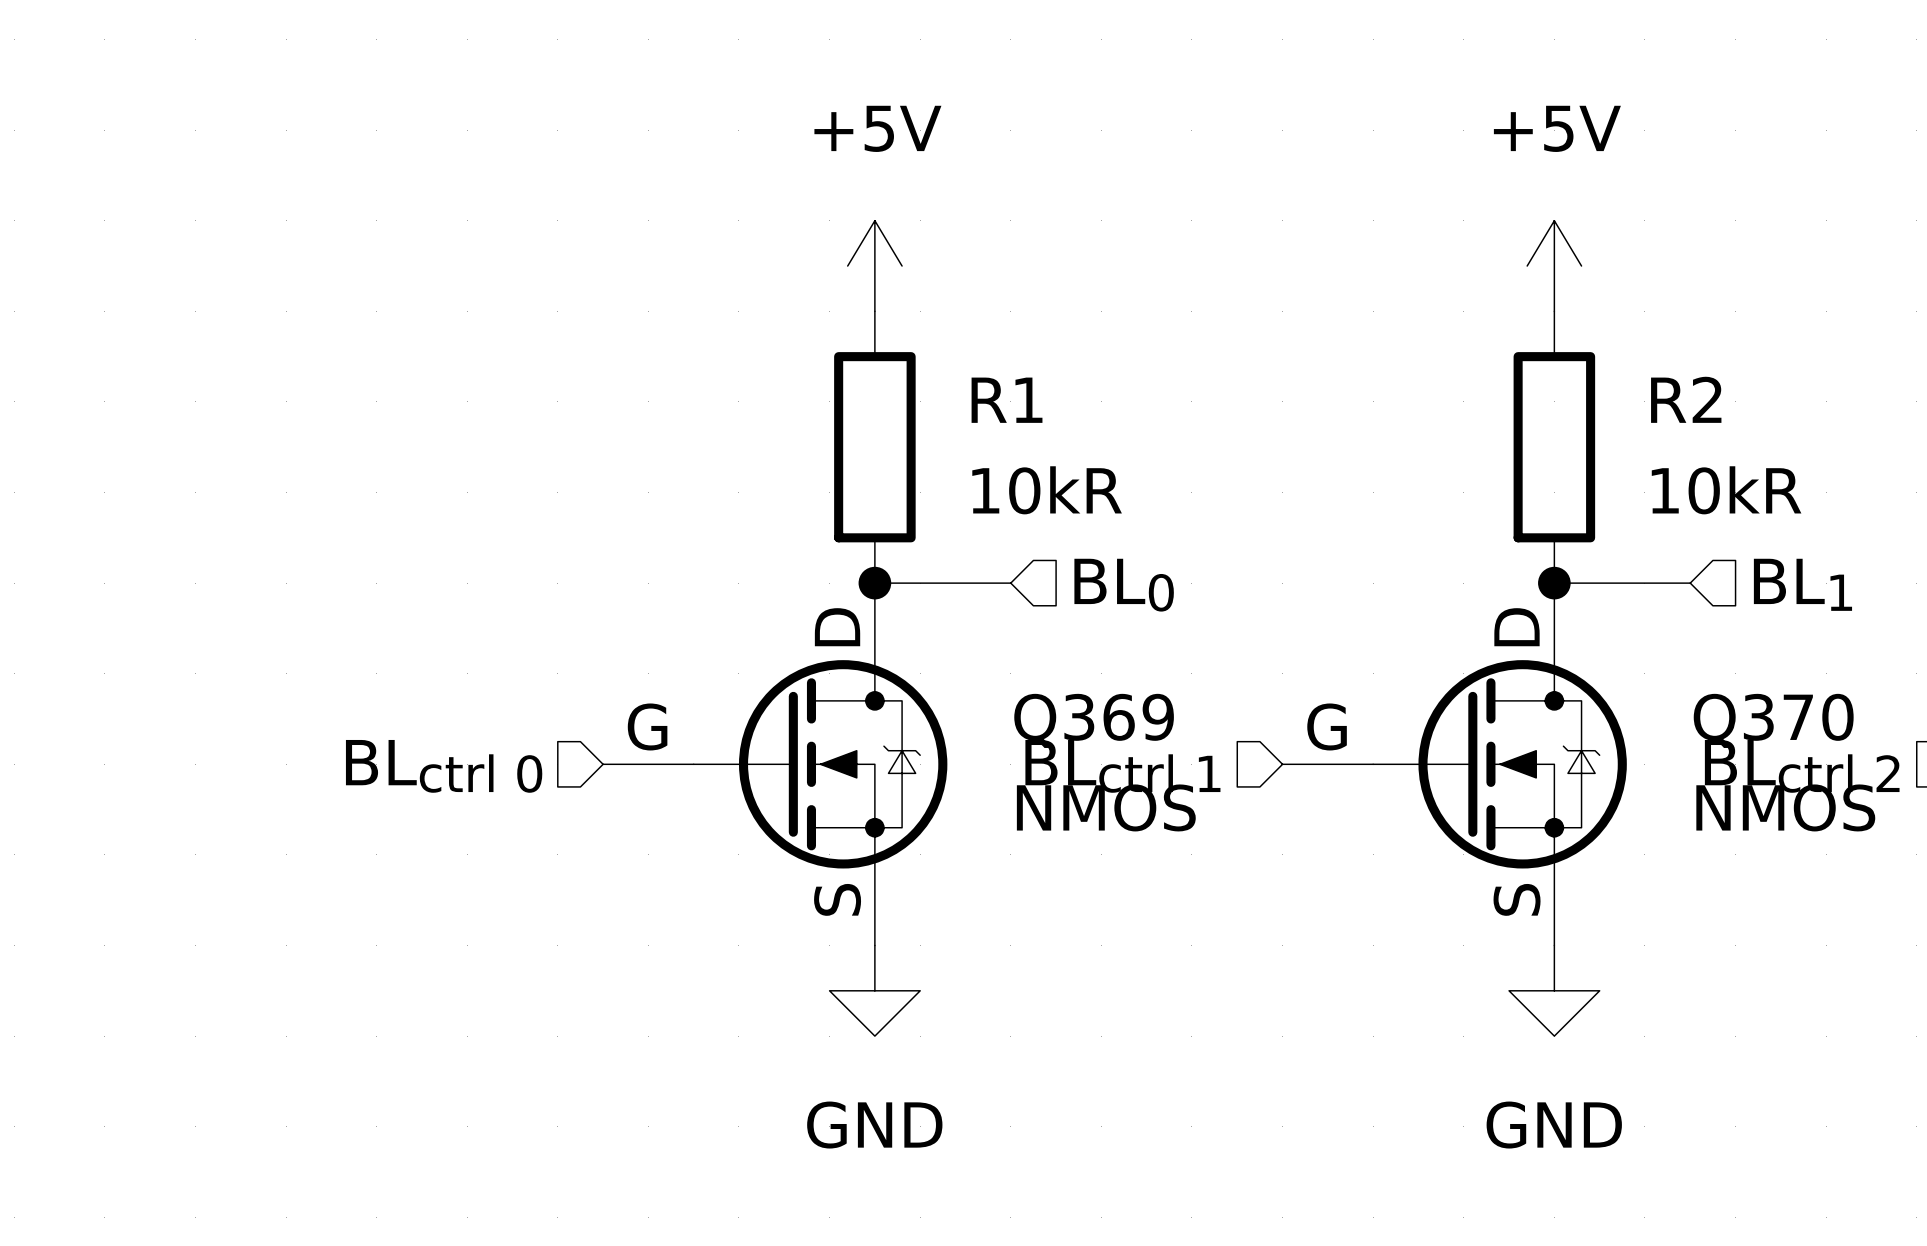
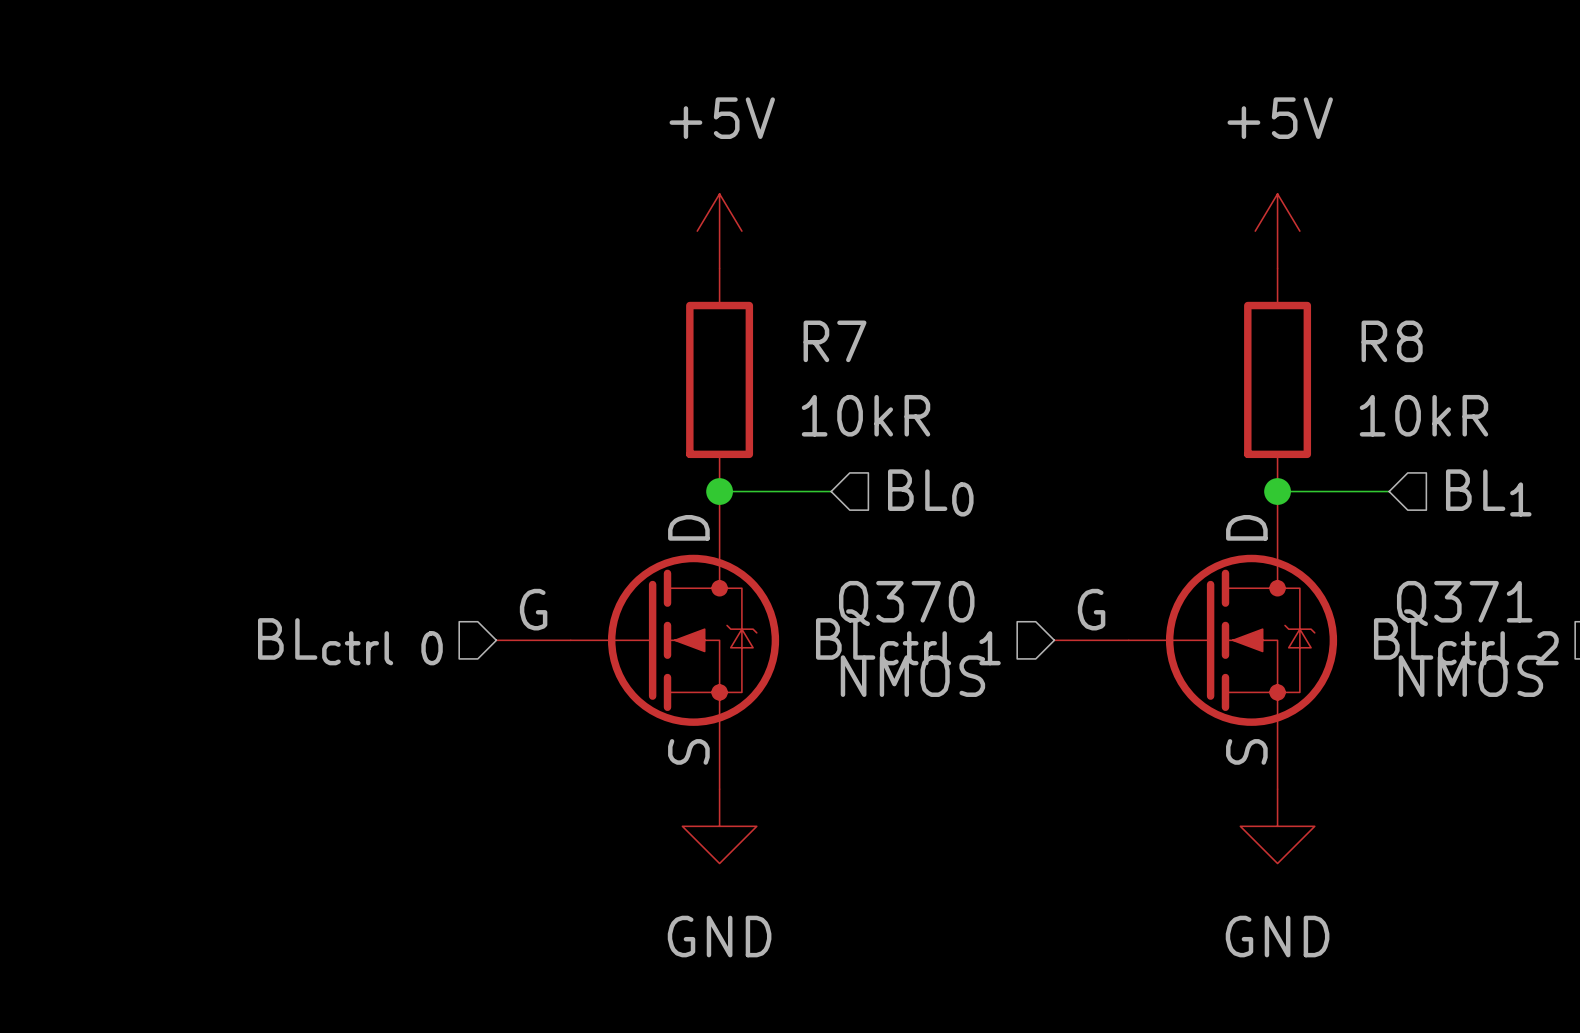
R2 name: R2 (1686, 399) -> R8 (1392, 341)
R1 name: R1 (1007, 400) -> R7 (835, 341)
Q369 name: Q369 (1094, 720) -> Q370 (906, 603)
Q370 name: Q370 (1773, 720) -> Q371 (1464, 603)

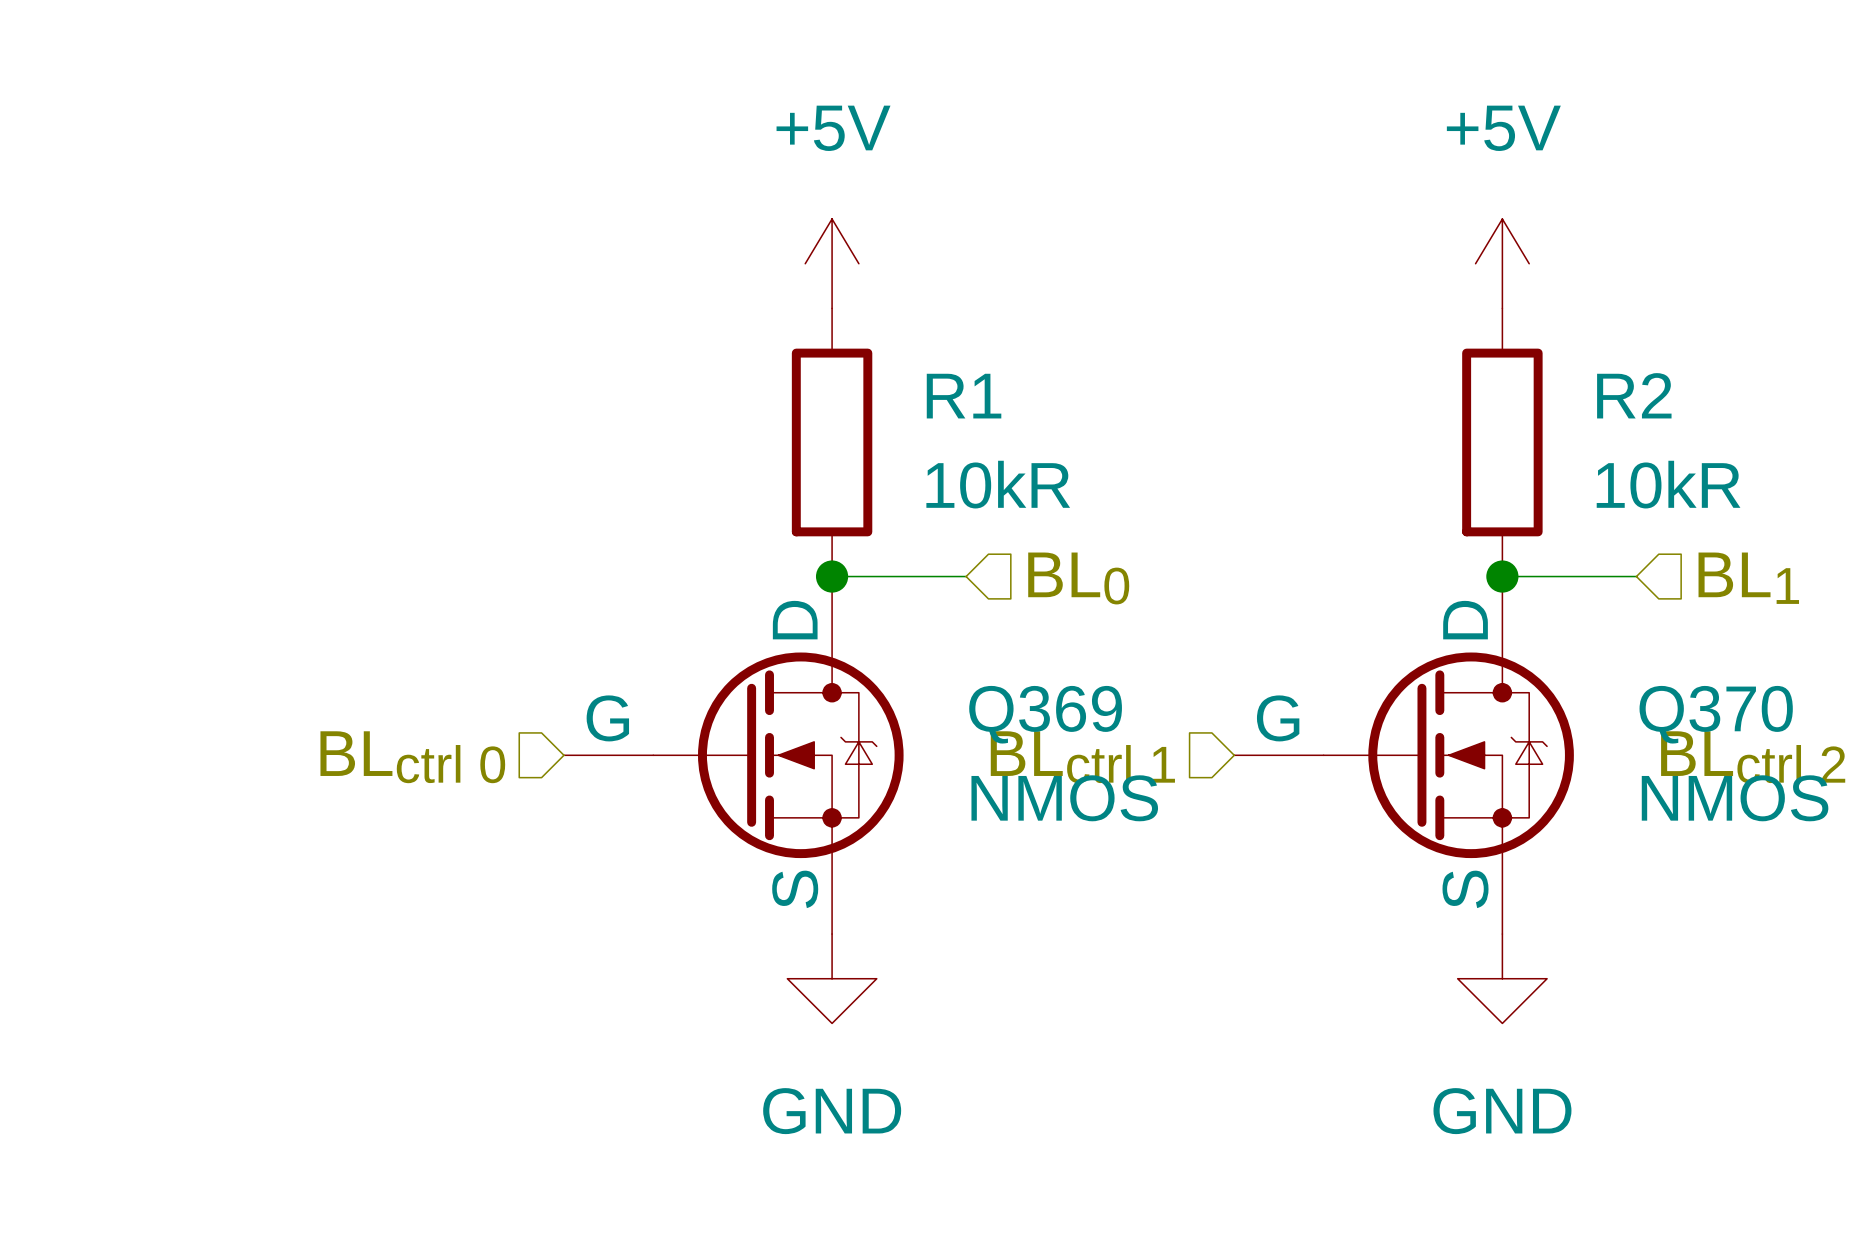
R7 name: R7 (835, 341) -> R1 (964, 396)
R8 name: R8 (1392, 341) -> R2 (1634, 395)
Q370 name: Q370 (906, 603) -> Q369 (1045, 714)
Q371 name: Q371 (1464, 603) -> Q370 (1716, 714)

